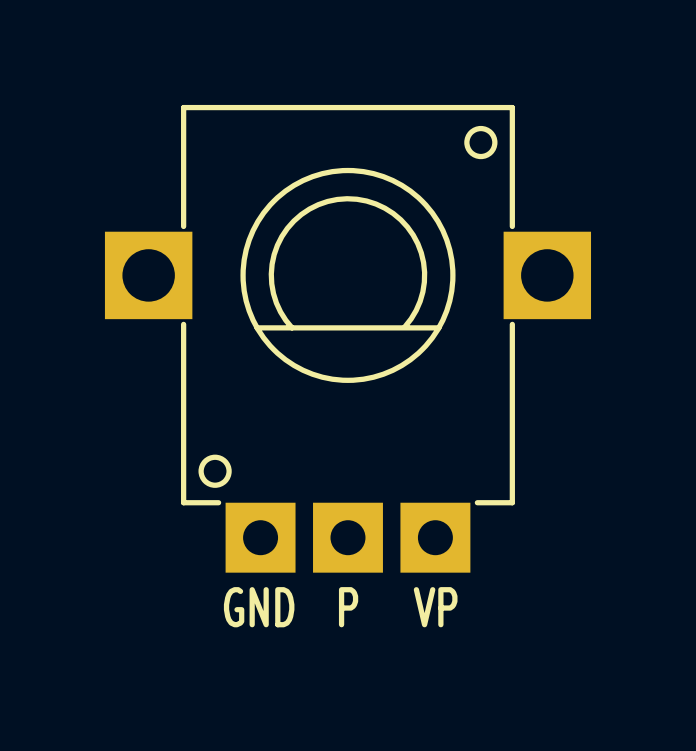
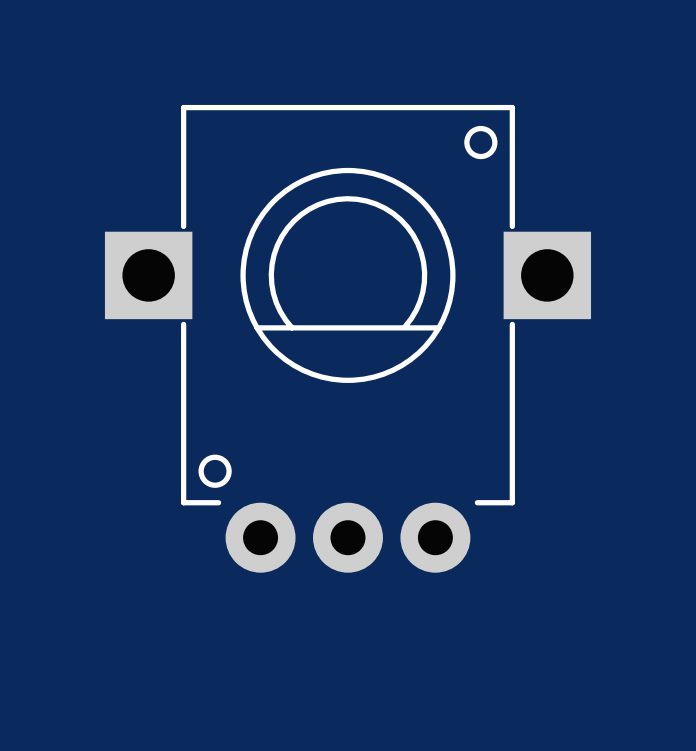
part footprint: [104, 104, 592, 573] -> [104, 104, 592, 573]
text: GND (259, 607) -> none
text: P (348, 607) -> none
text: VP (435, 607) -> none

